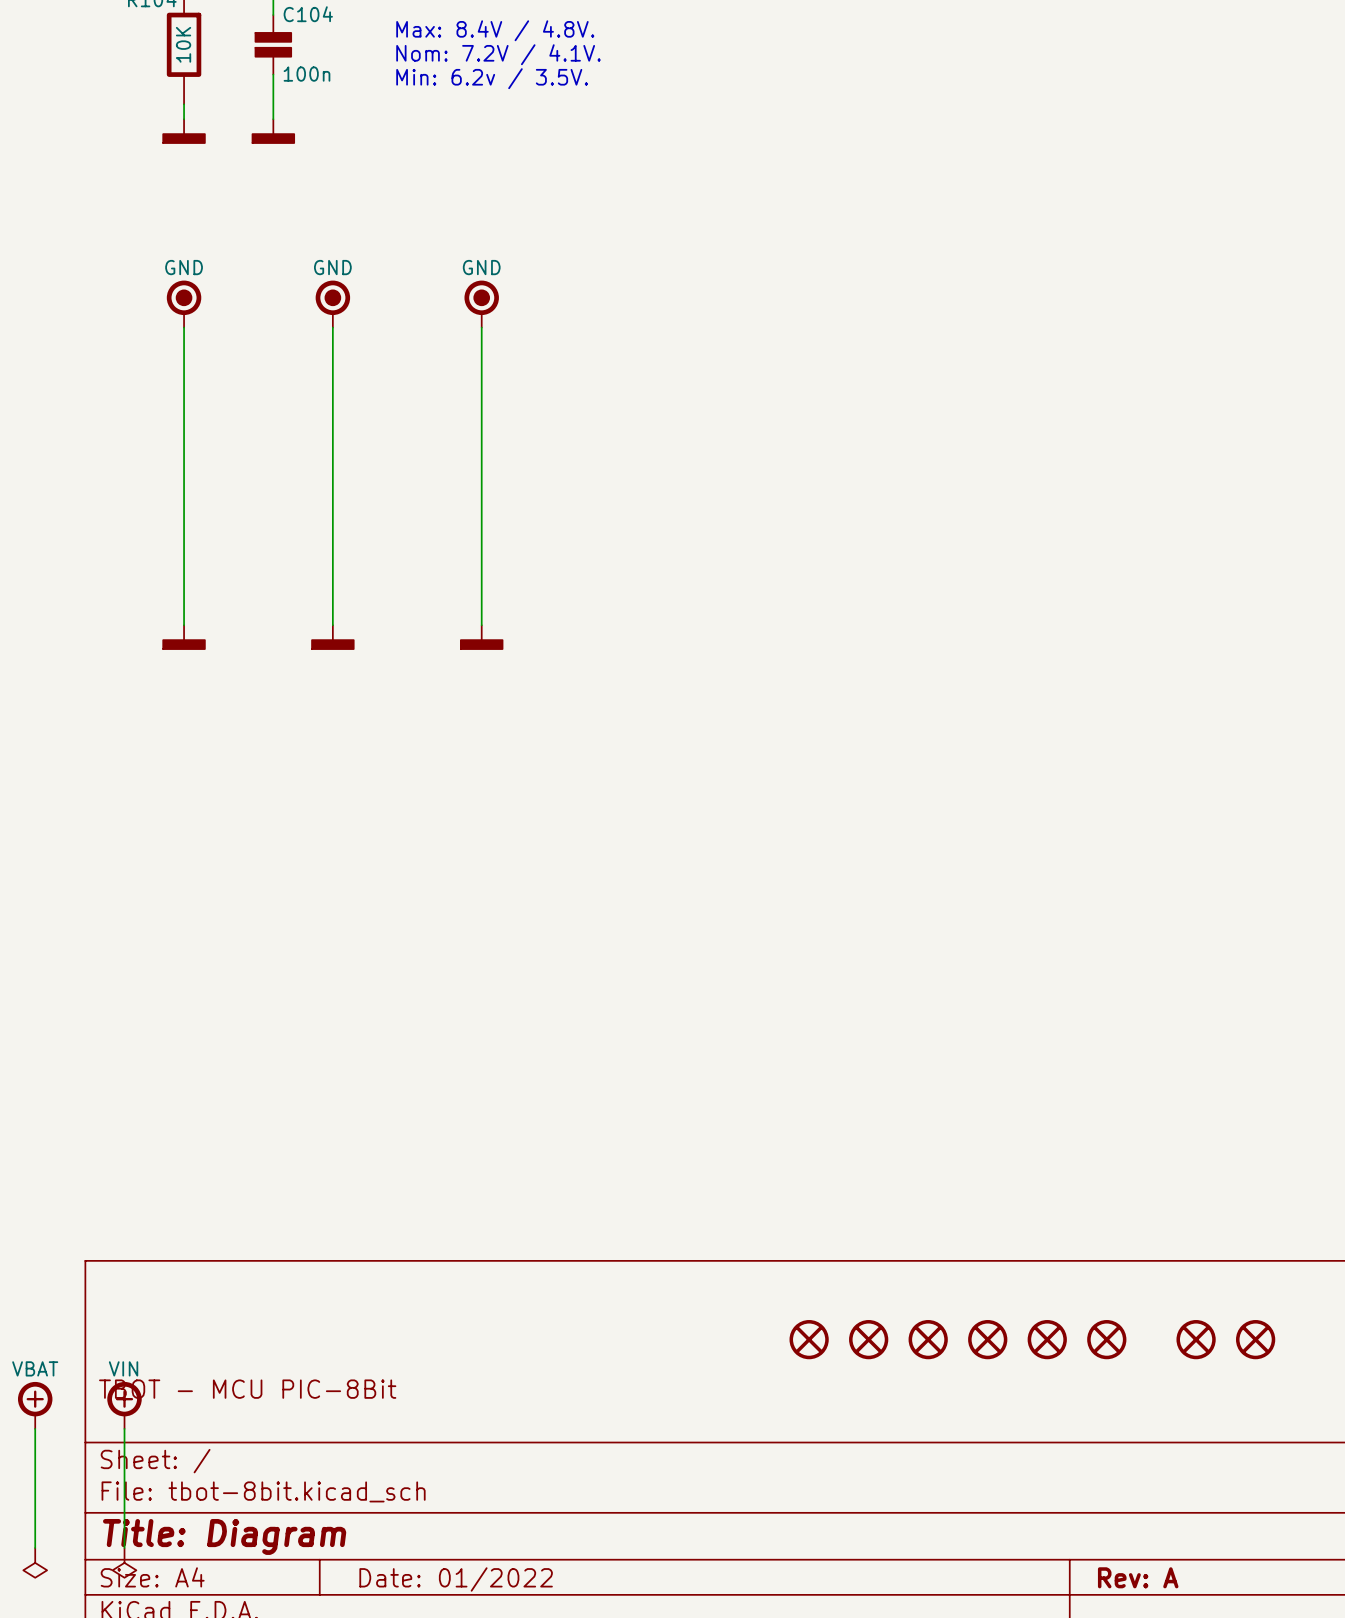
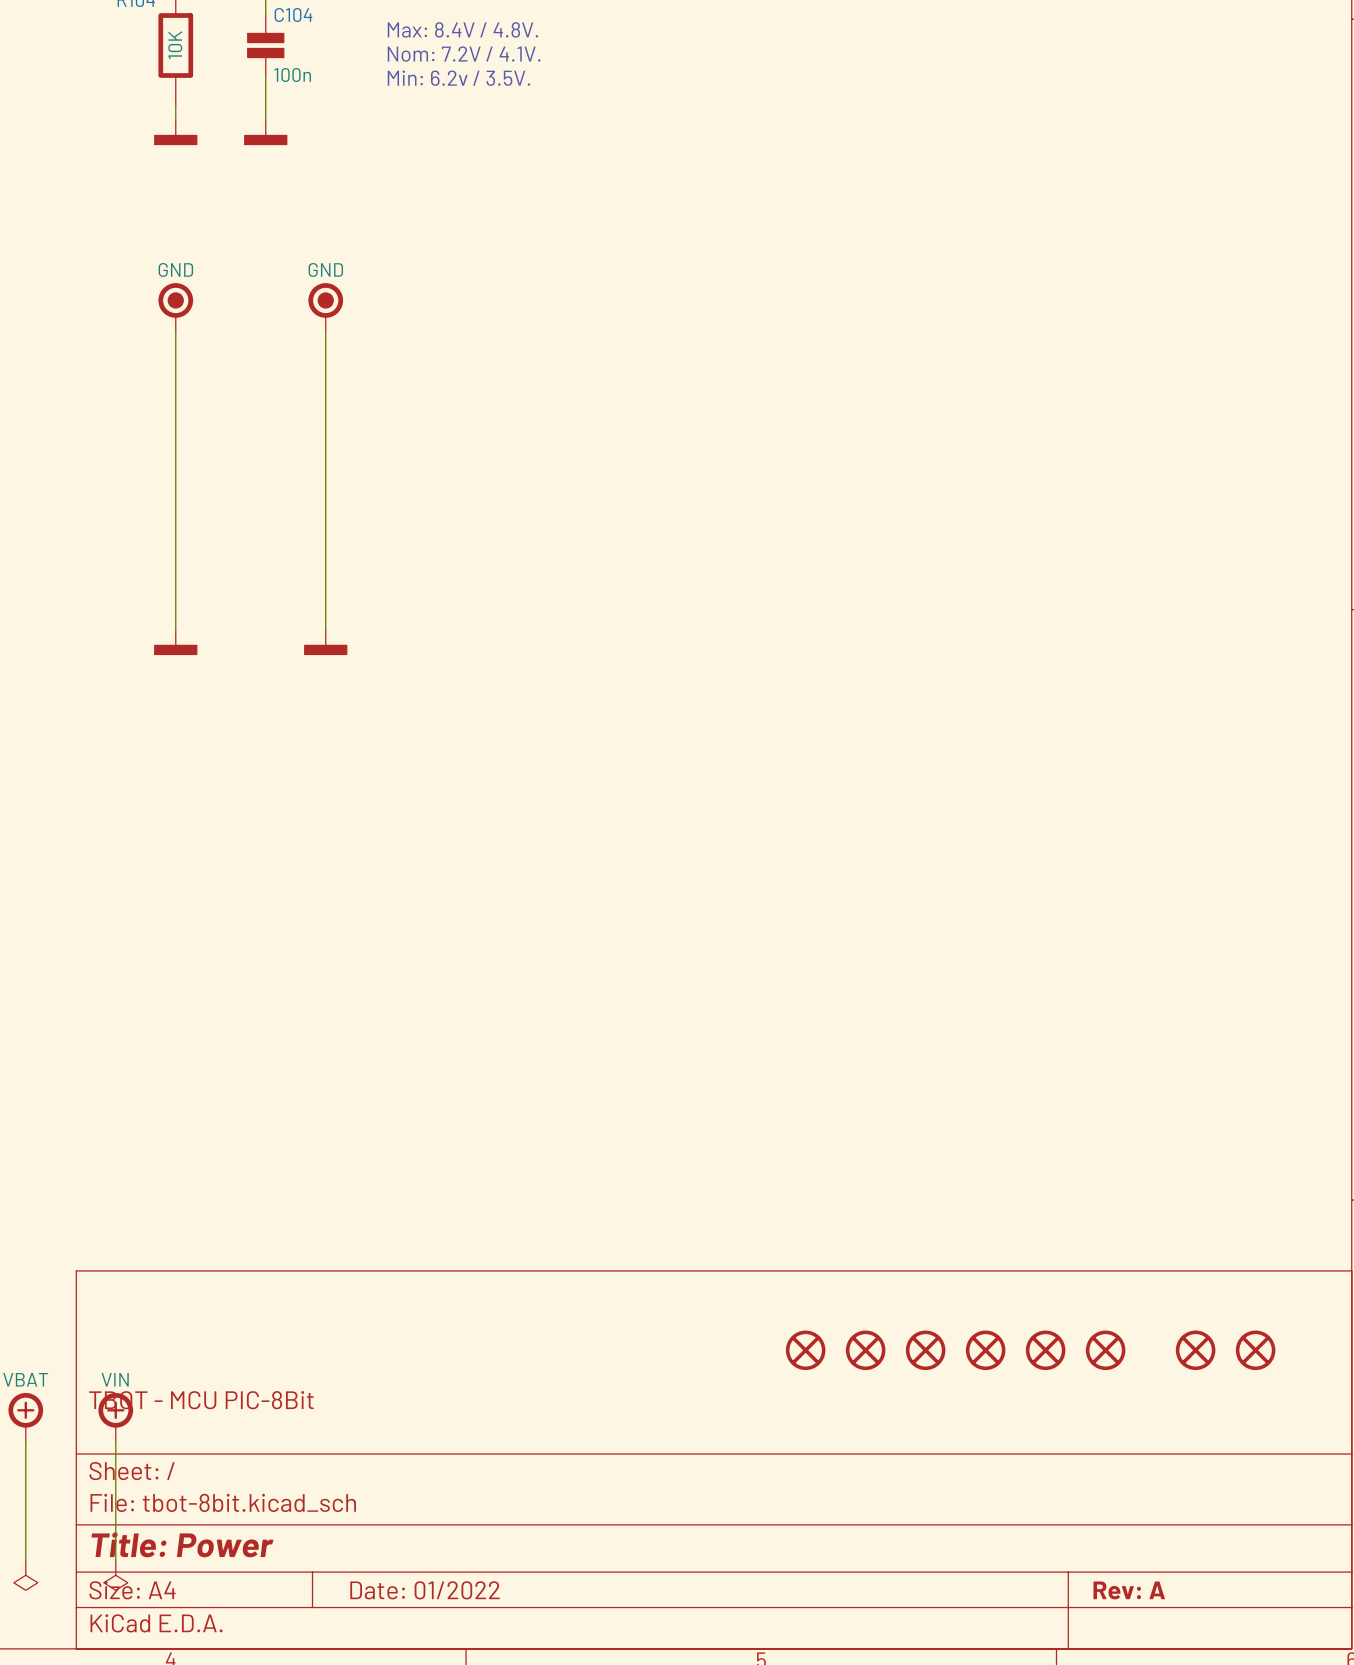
part: GND (481, 304) -> none
wire: (481, 327) (481, 625) -> none
power symbol: (481, 637) -> none
title block: Title: Diagram (224, 1536) -> Title: Power (182, 1544)

